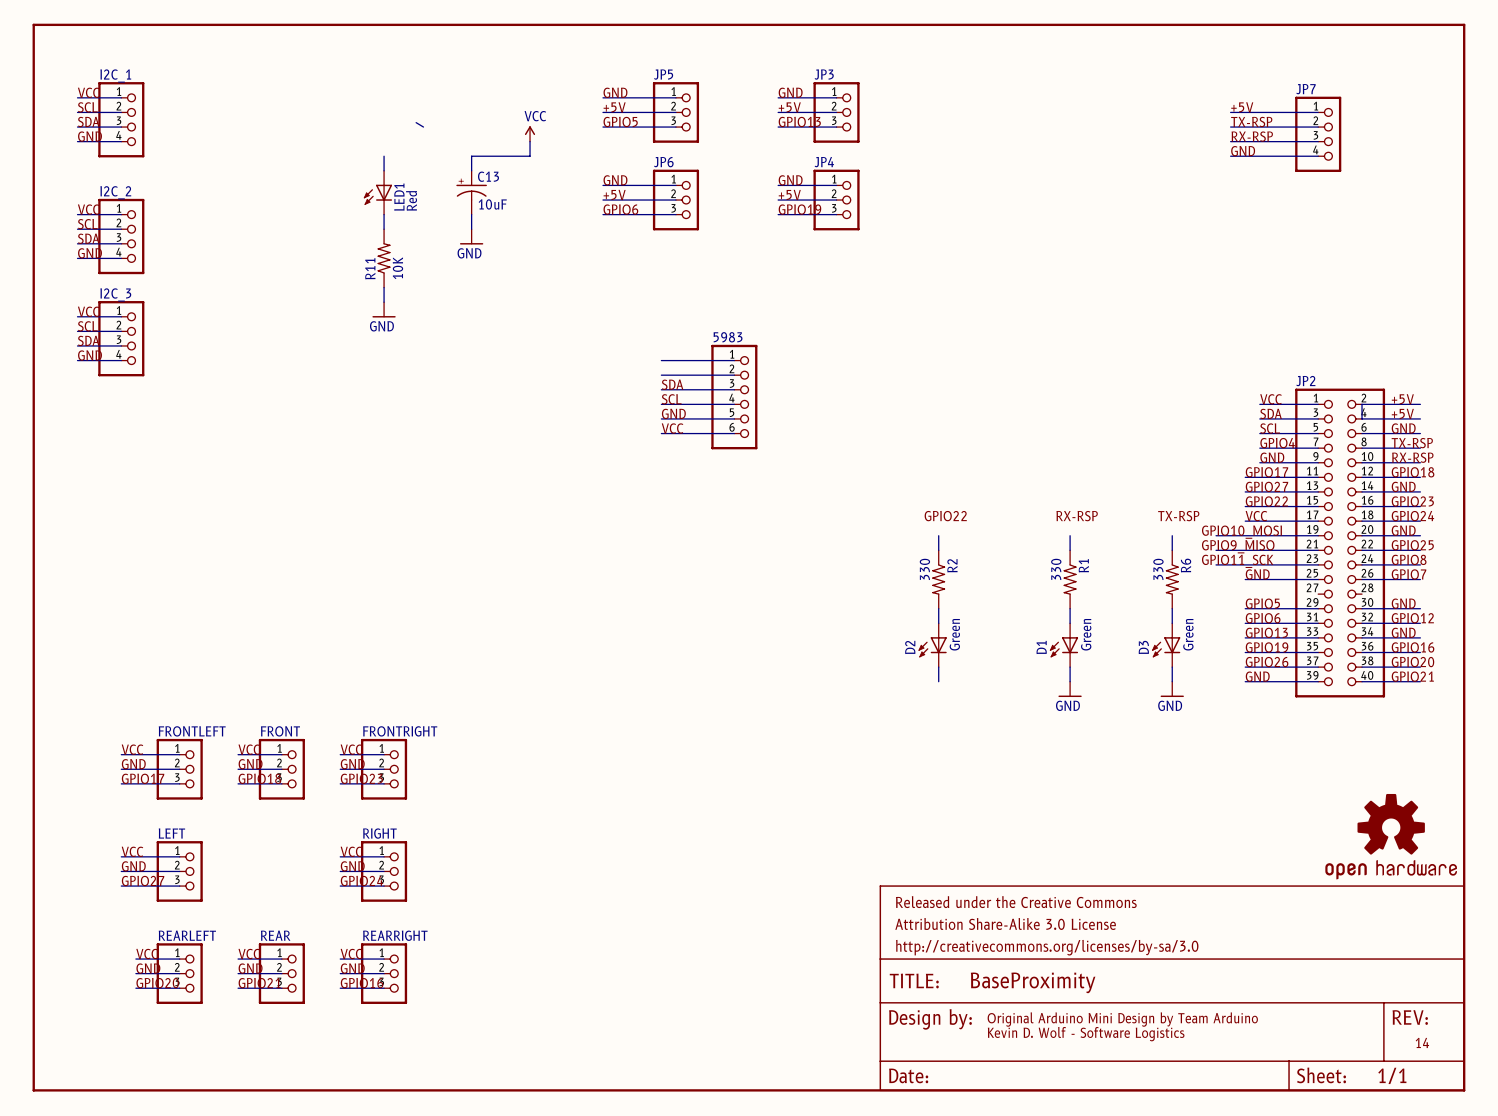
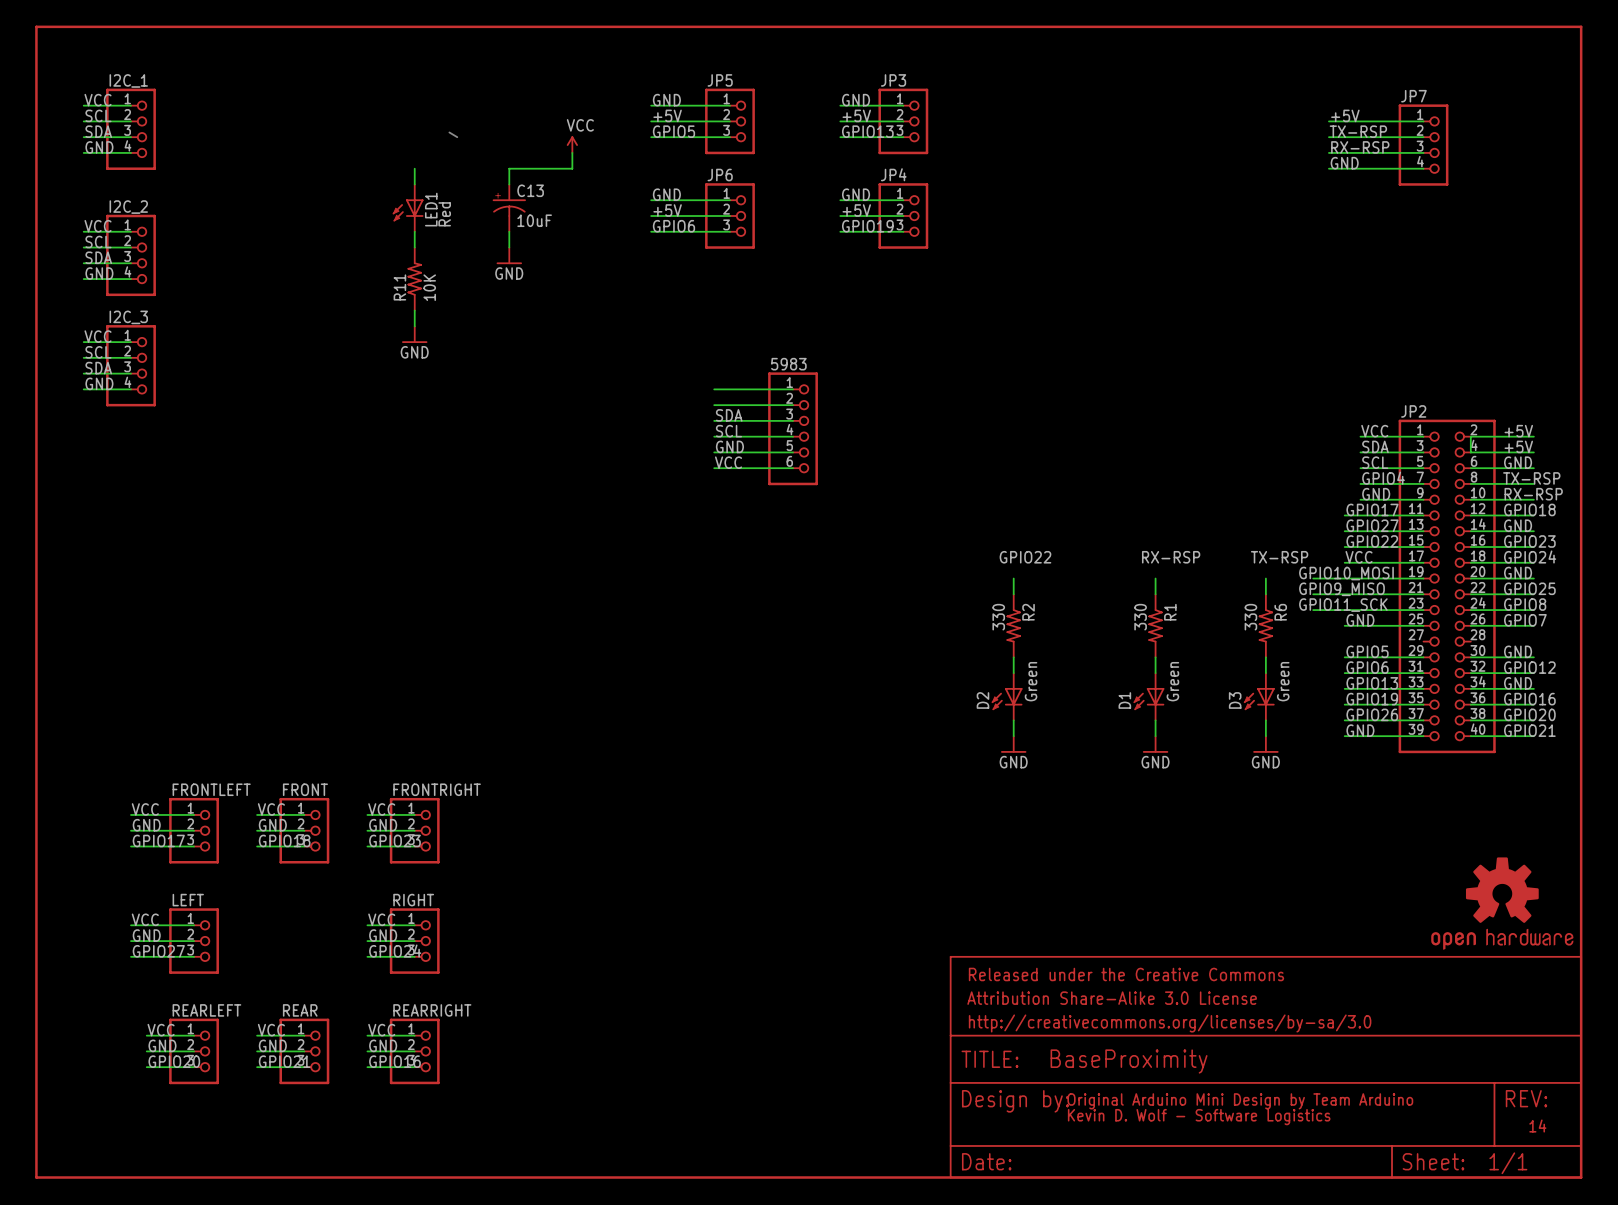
power symbol: none -> GND (1013, 744)

